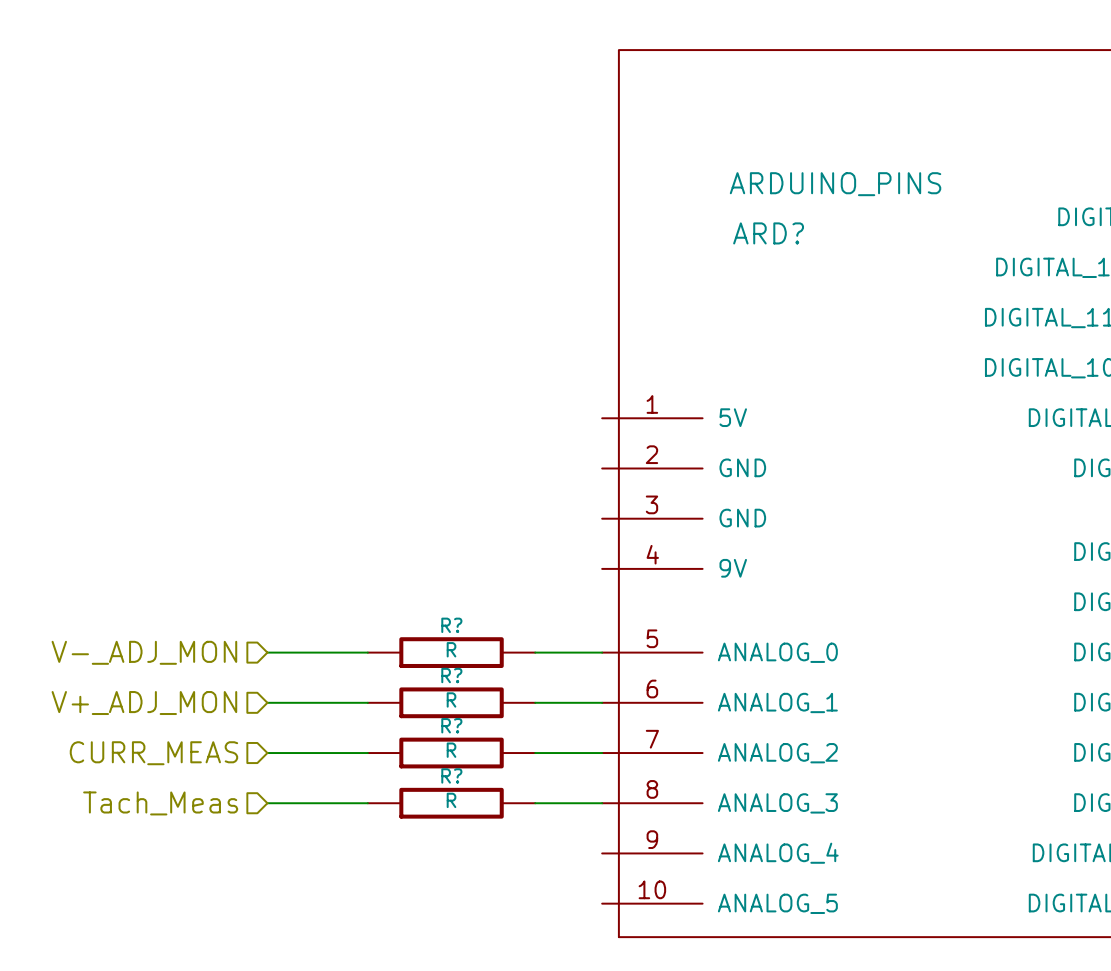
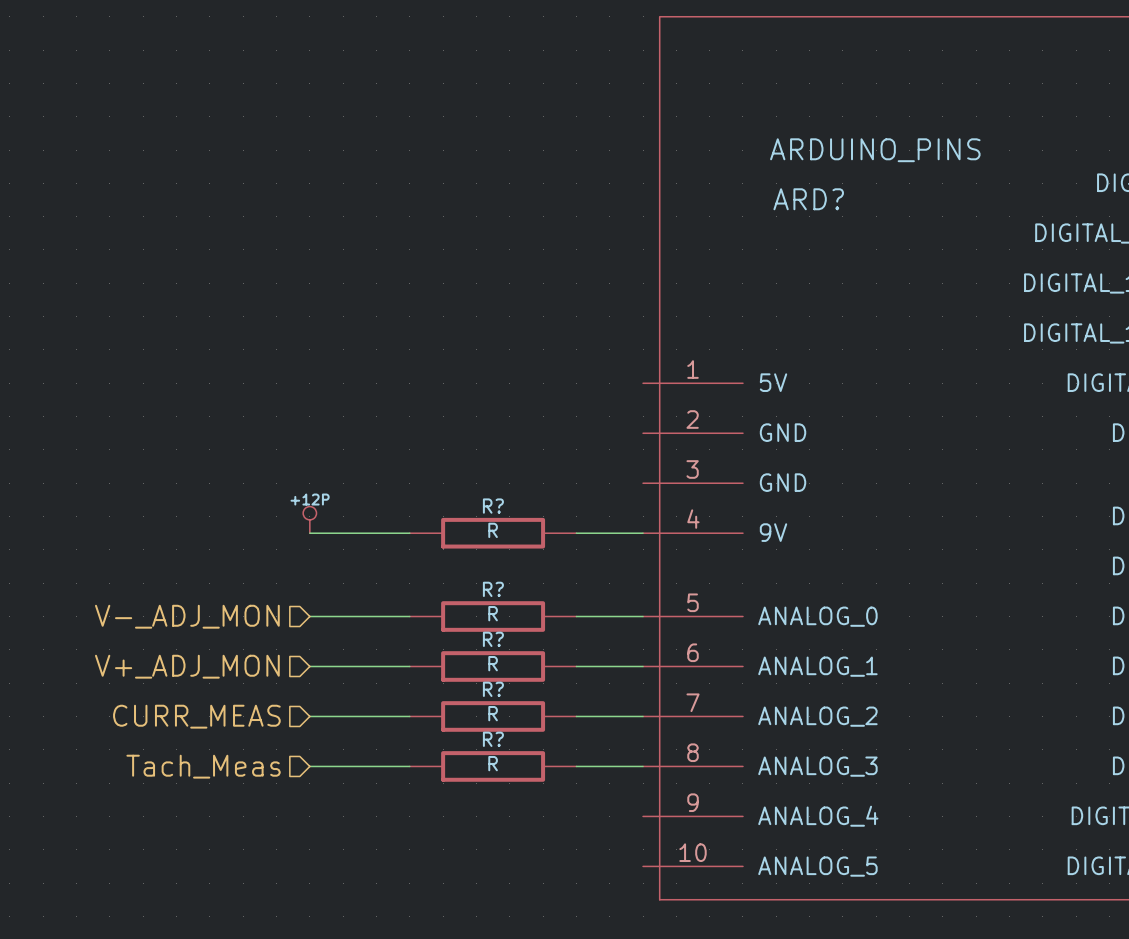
power symbol: none -> +12P (309, 519)
wire: none -> (309, 533) (409, 533)
R?: none -> R (493, 533)
wire: none -> (576, 533) (643, 533)

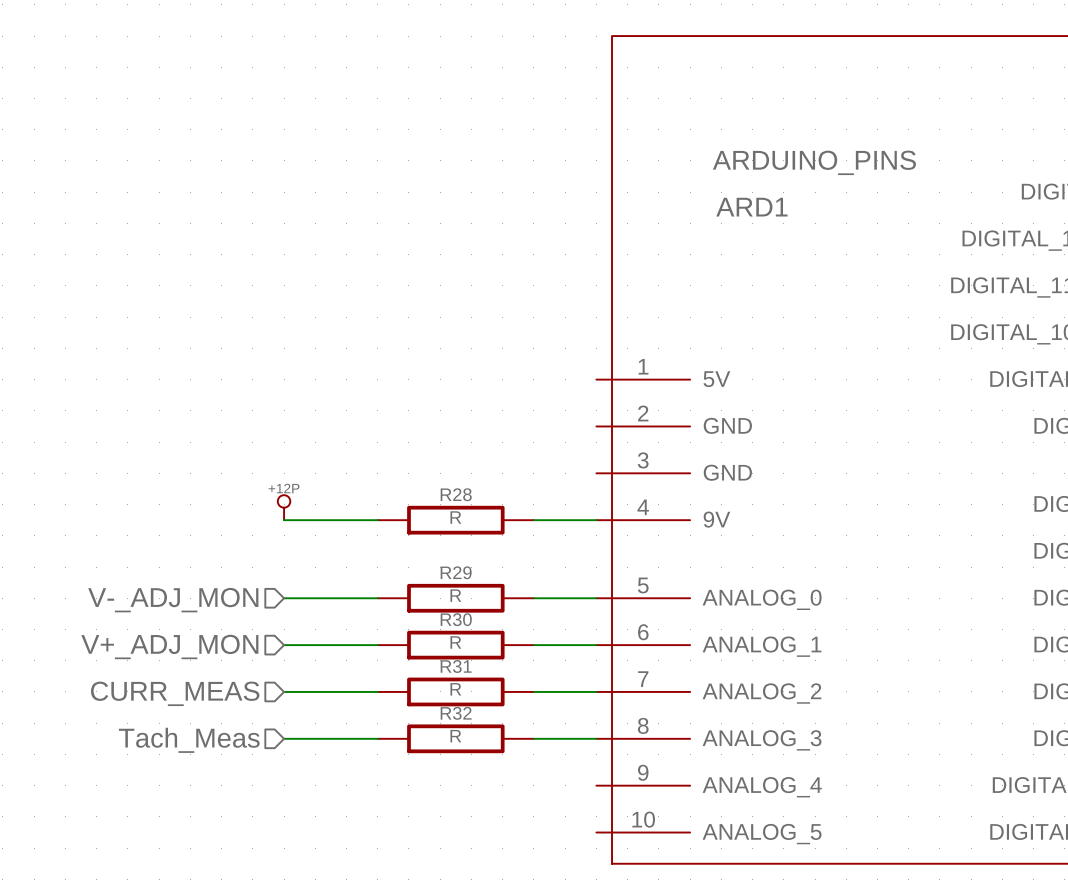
ARD? name: ARD? (808, 199) -> ARD1 (751, 207)
R? name: R? (493, 506) -> R28 (456, 494)
R? name: R? (493, 589) -> R29 (456, 572)
R? name: R? (493, 639) -> R30 (456, 619)
R? name: R? (493, 689) -> R31 (456, 666)
R? name: R? (493, 739) -> R32 (456, 713)

